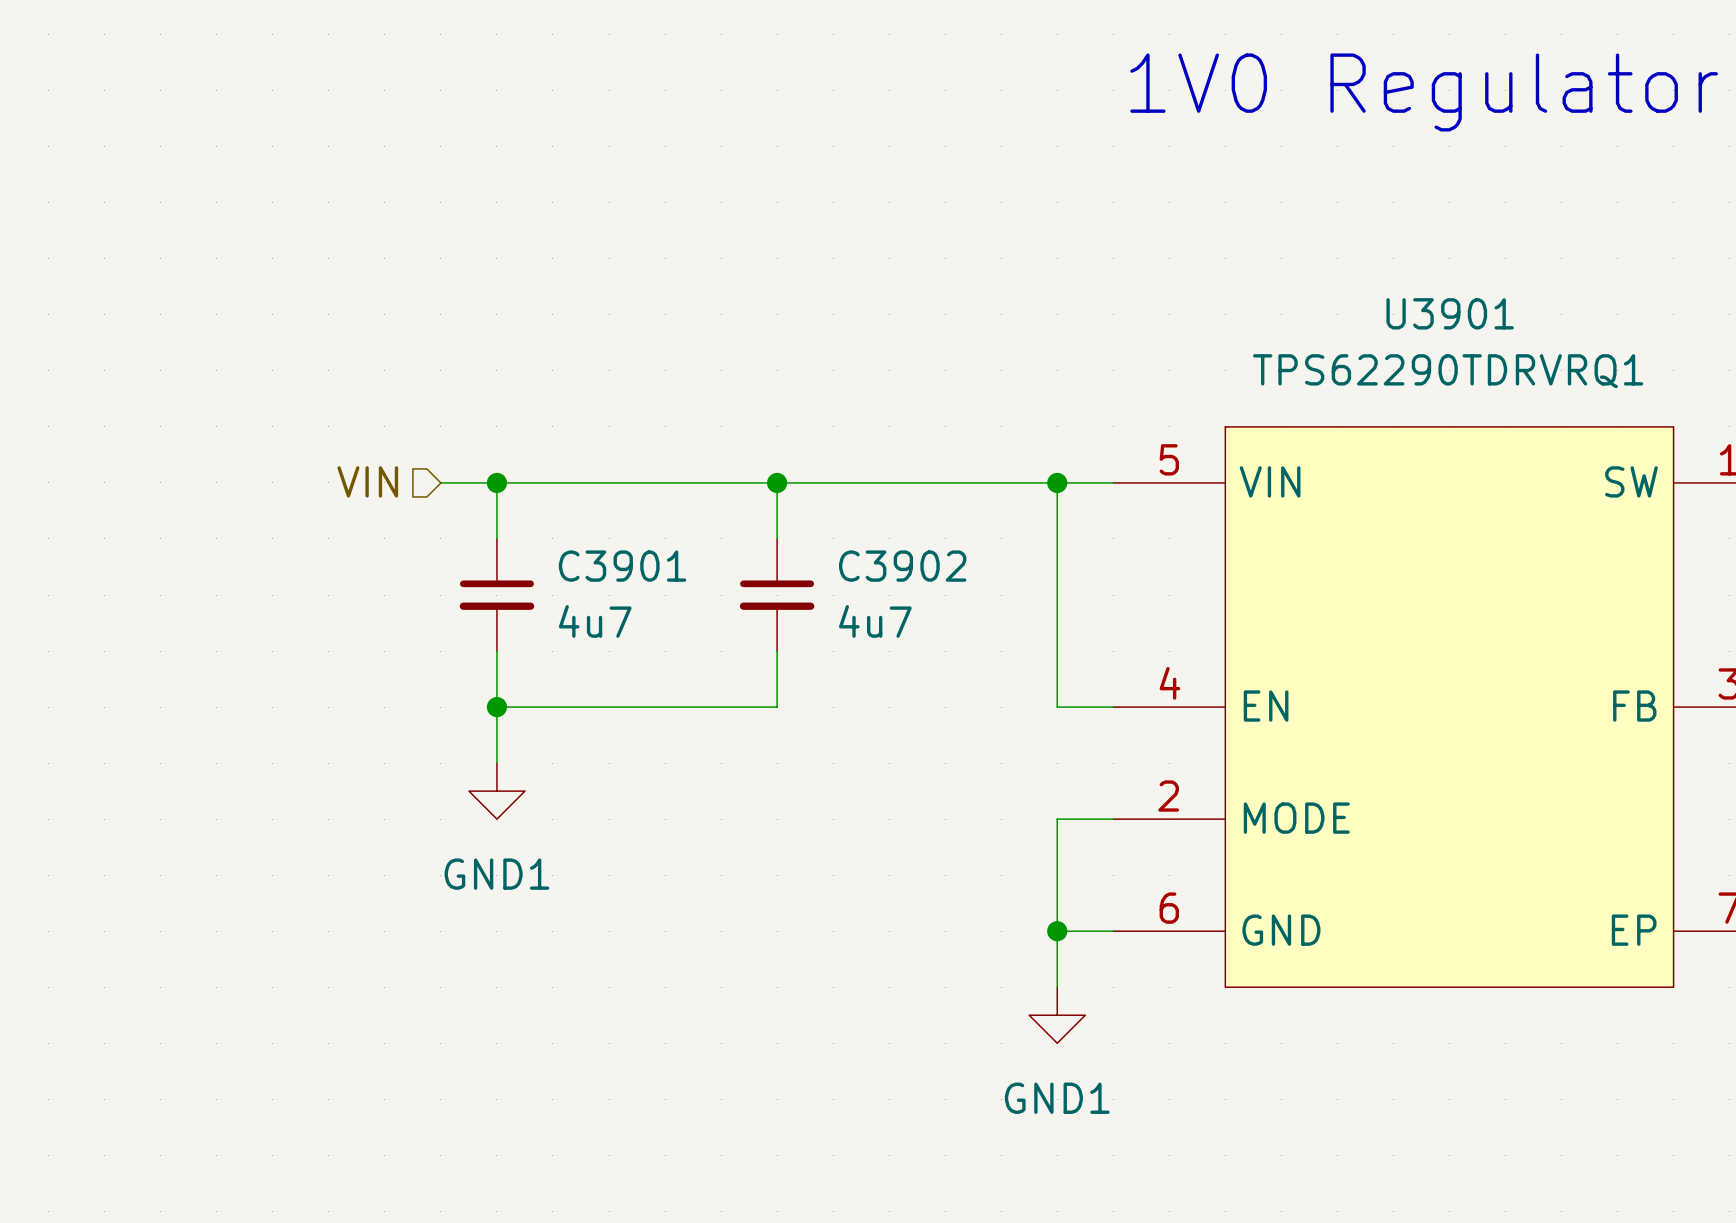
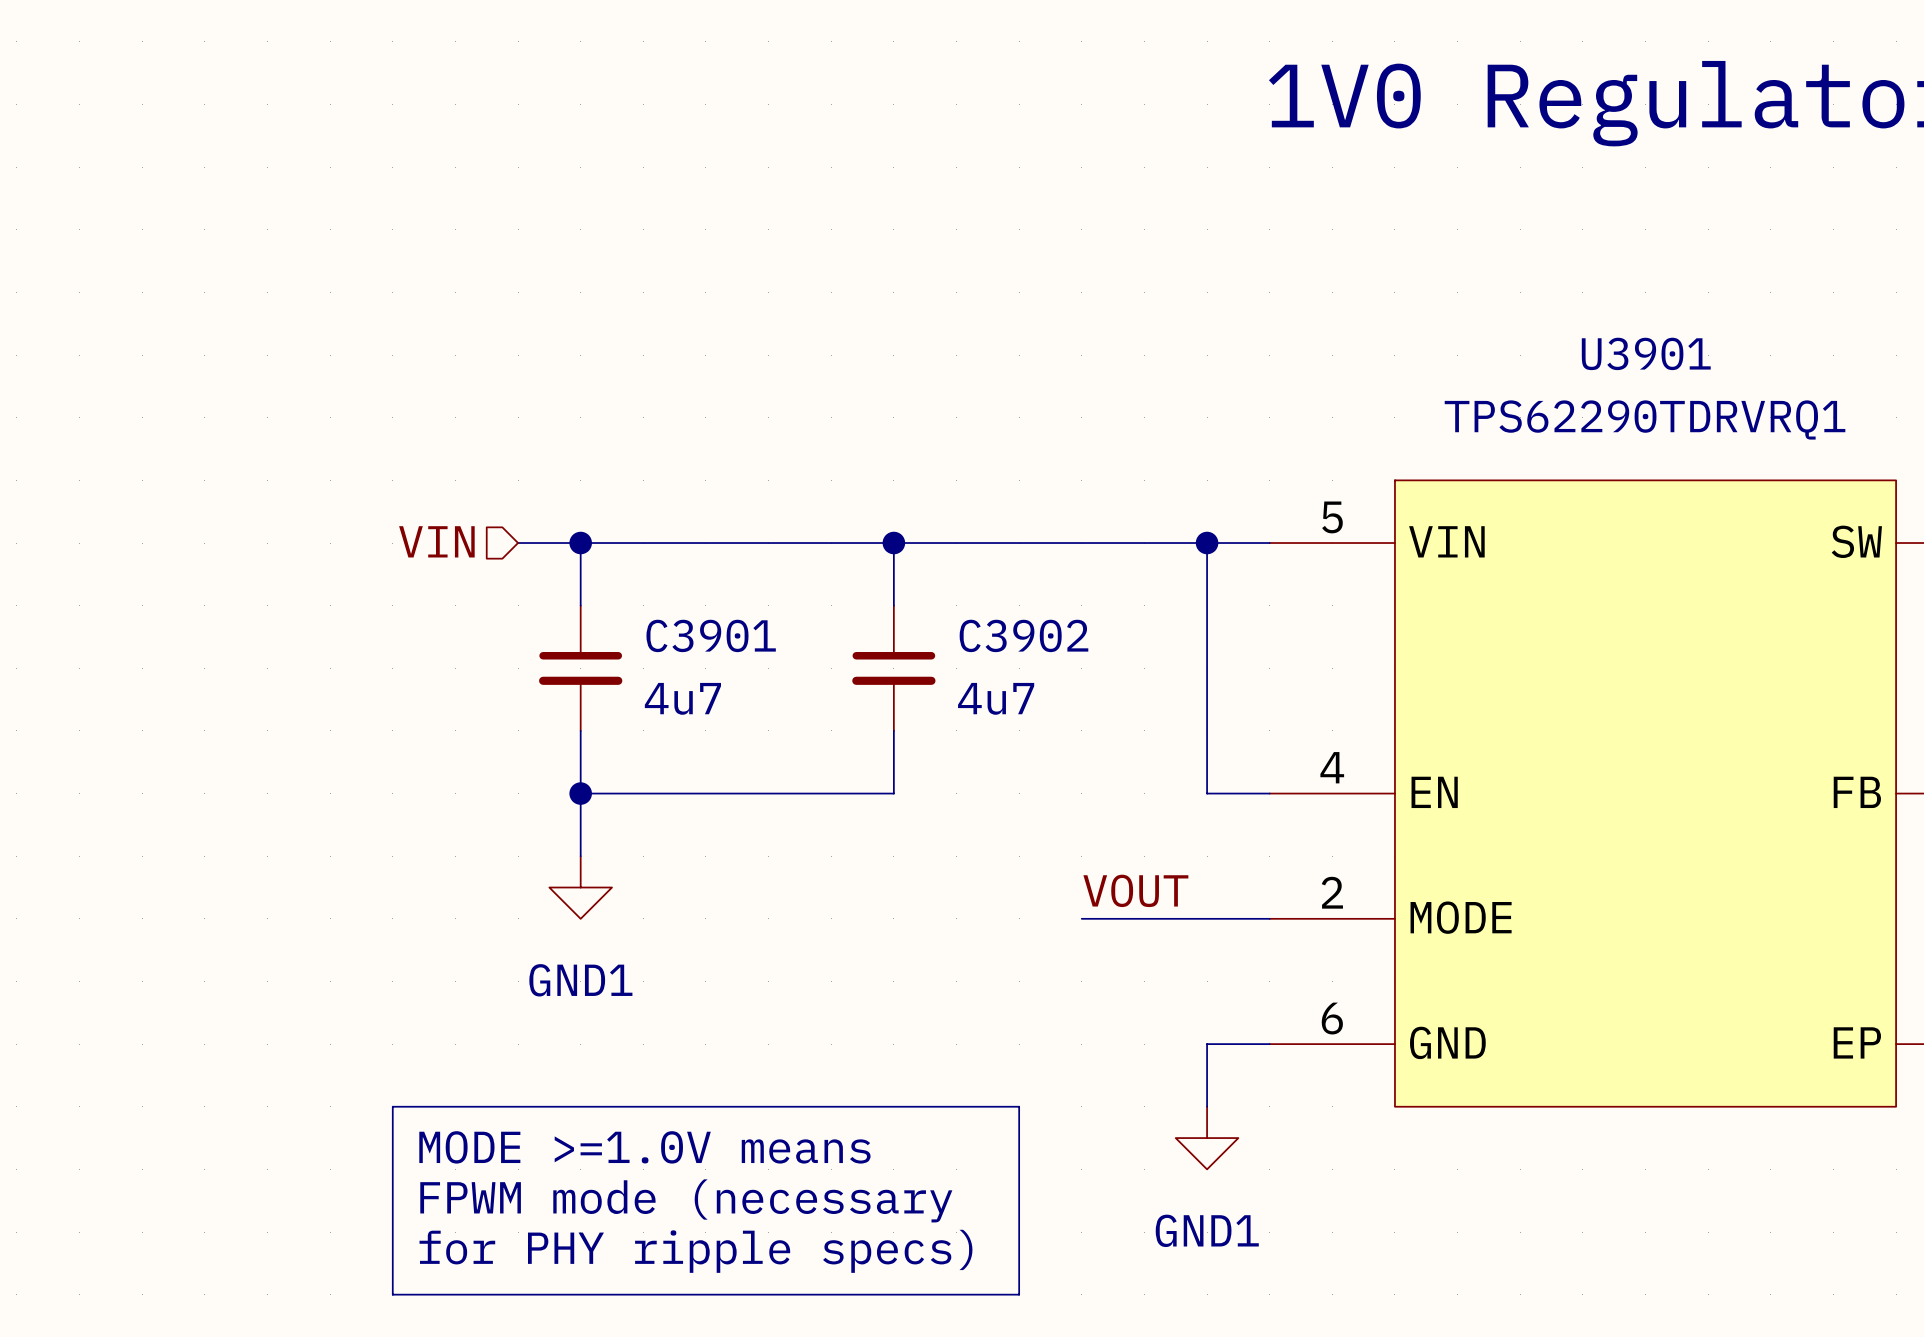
label: none -> VOUT (1135, 890)
wire: (1057, 819) (1057, 931) -> (1207, 918) (1081, 918)
junction: (1057, 931) -> none
line: none -> (392, 1106) (1019, 1106) (1019, 1294) (392, 1294) (392, 1106)
text: none -> MODE >=1.0V means (644, 1147)
text: none -> FPWM mode (necessary (686, 1200)
text: none -> for PHY ripple specs) (695, 1251)

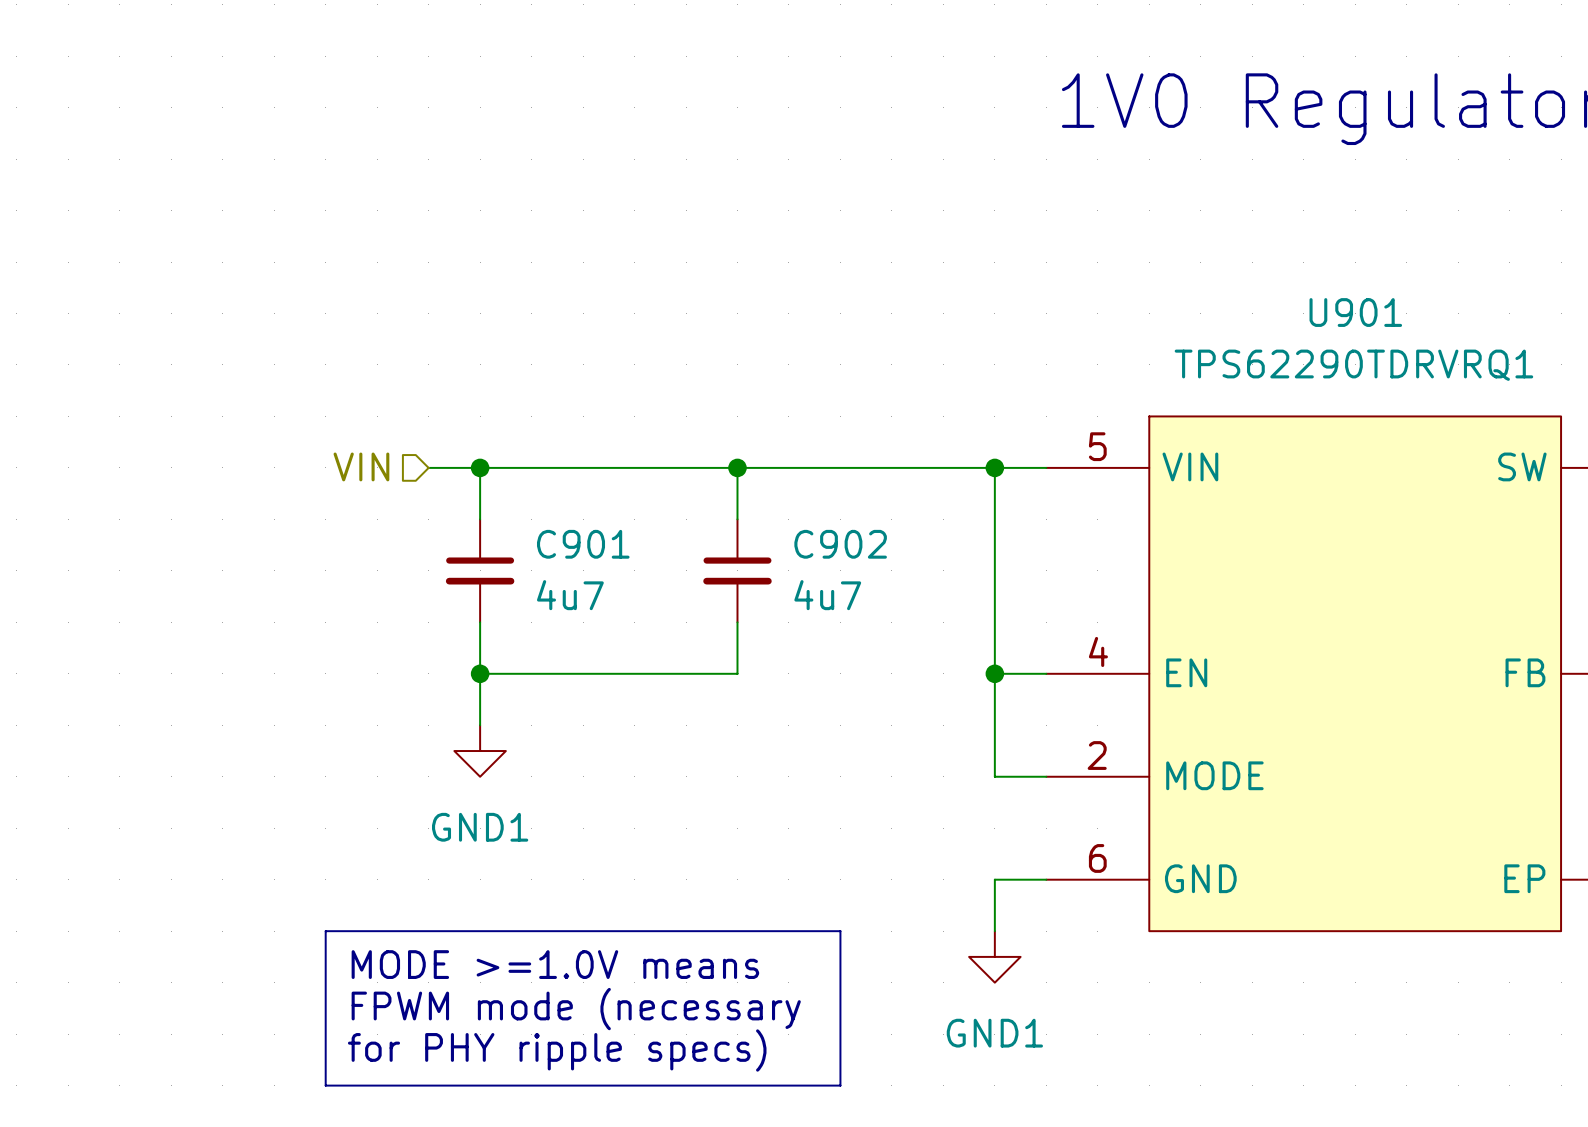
U3901 name: U3901 (1646, 353) -> U901 (1355, 312)
C3901 name: C3901 (711, 635) -> C901 (583, 544)
C3902 name: C3902 (1023, 635) -> C902 (840, 544)
junction: none -> (994, 673)
label: VOUT (1135, 890) -> none
wire: (1081, 918) (1207, 918) -> (994, 673) (994, 776)

